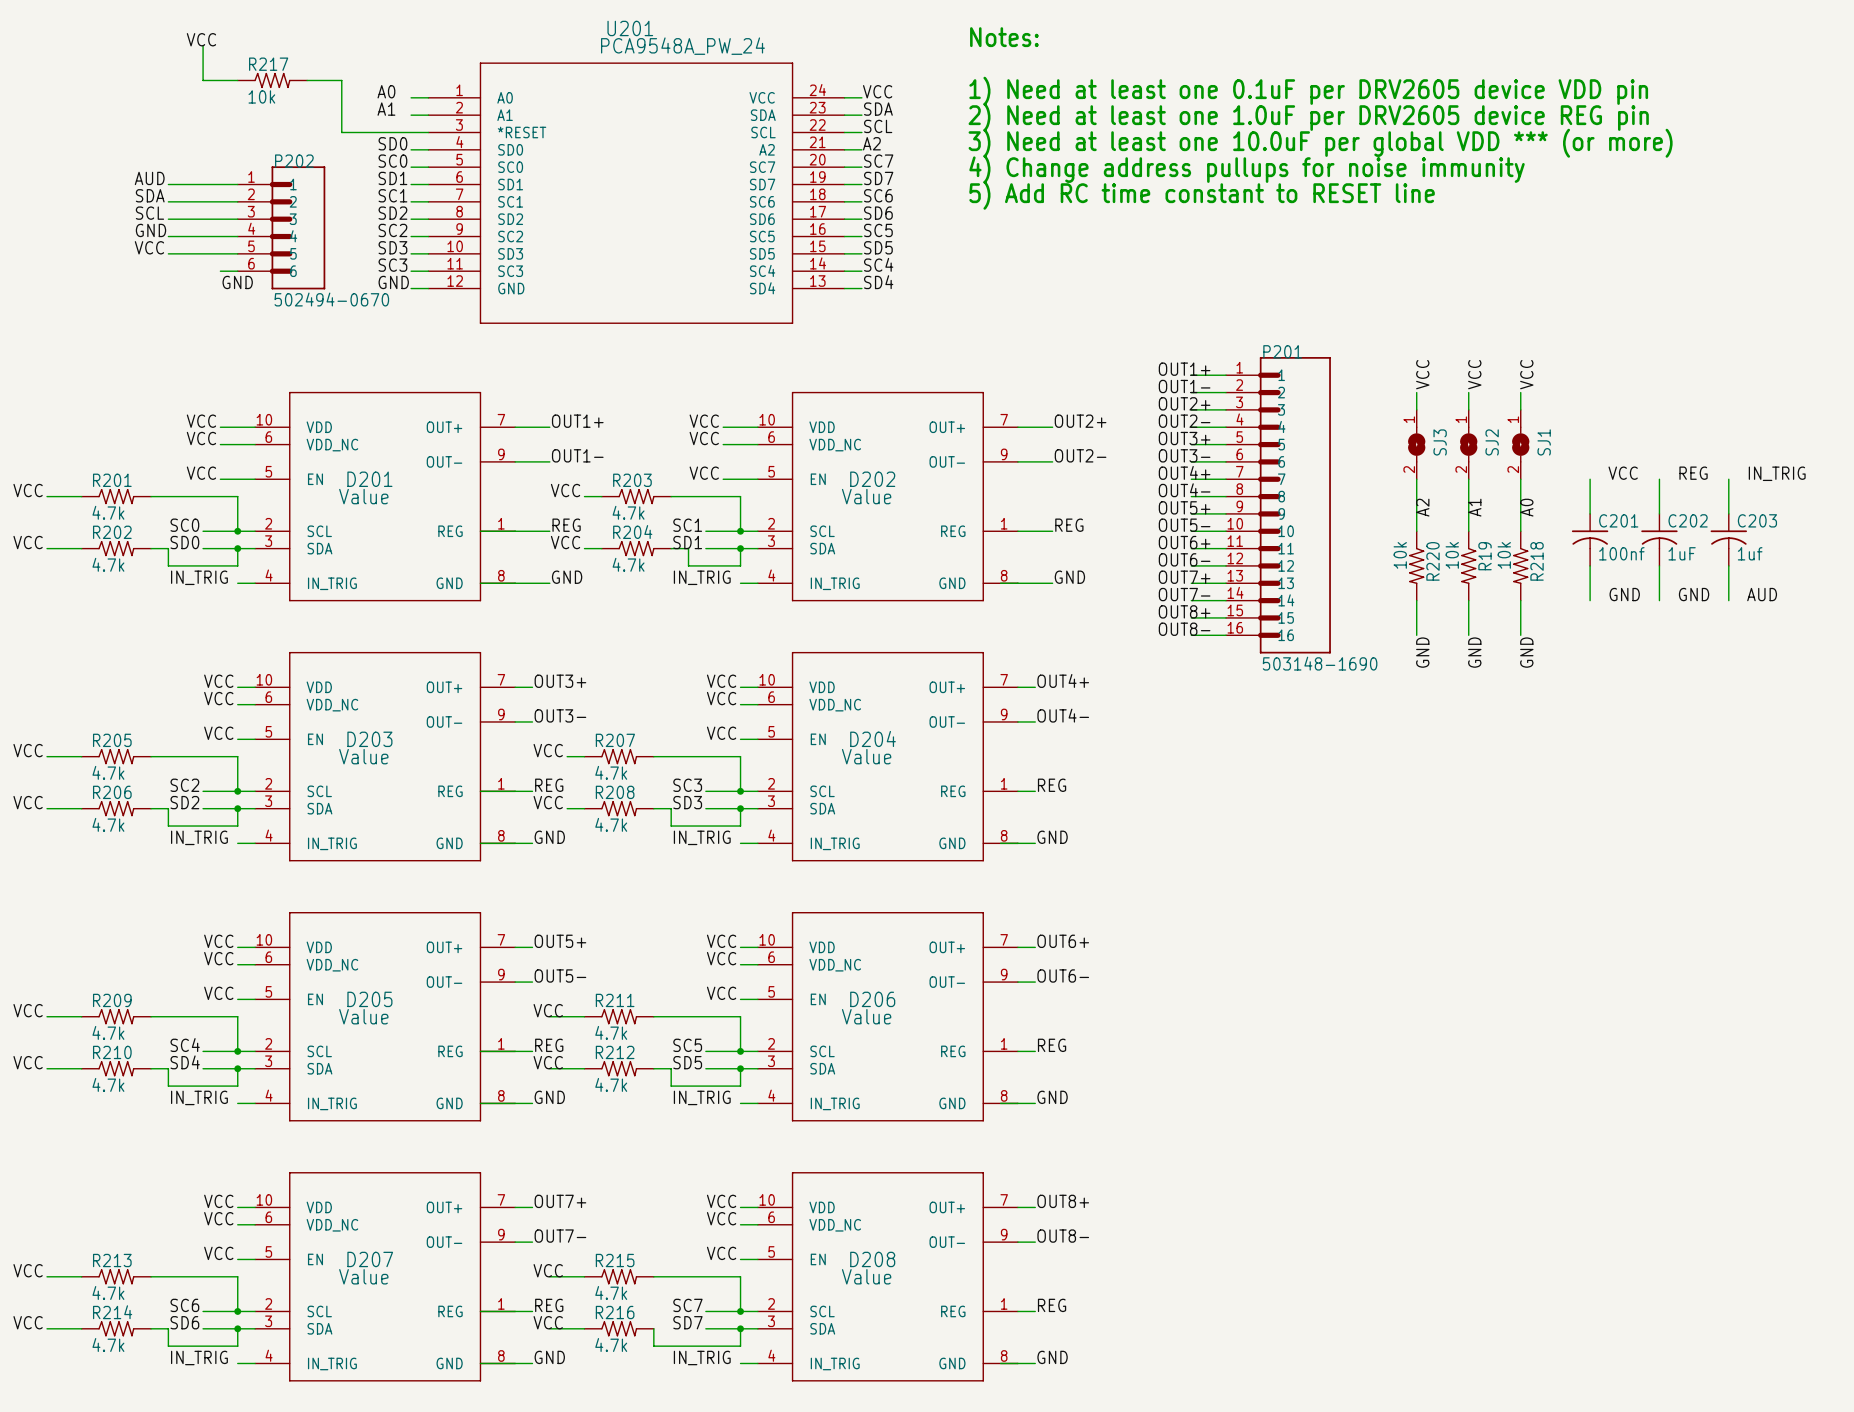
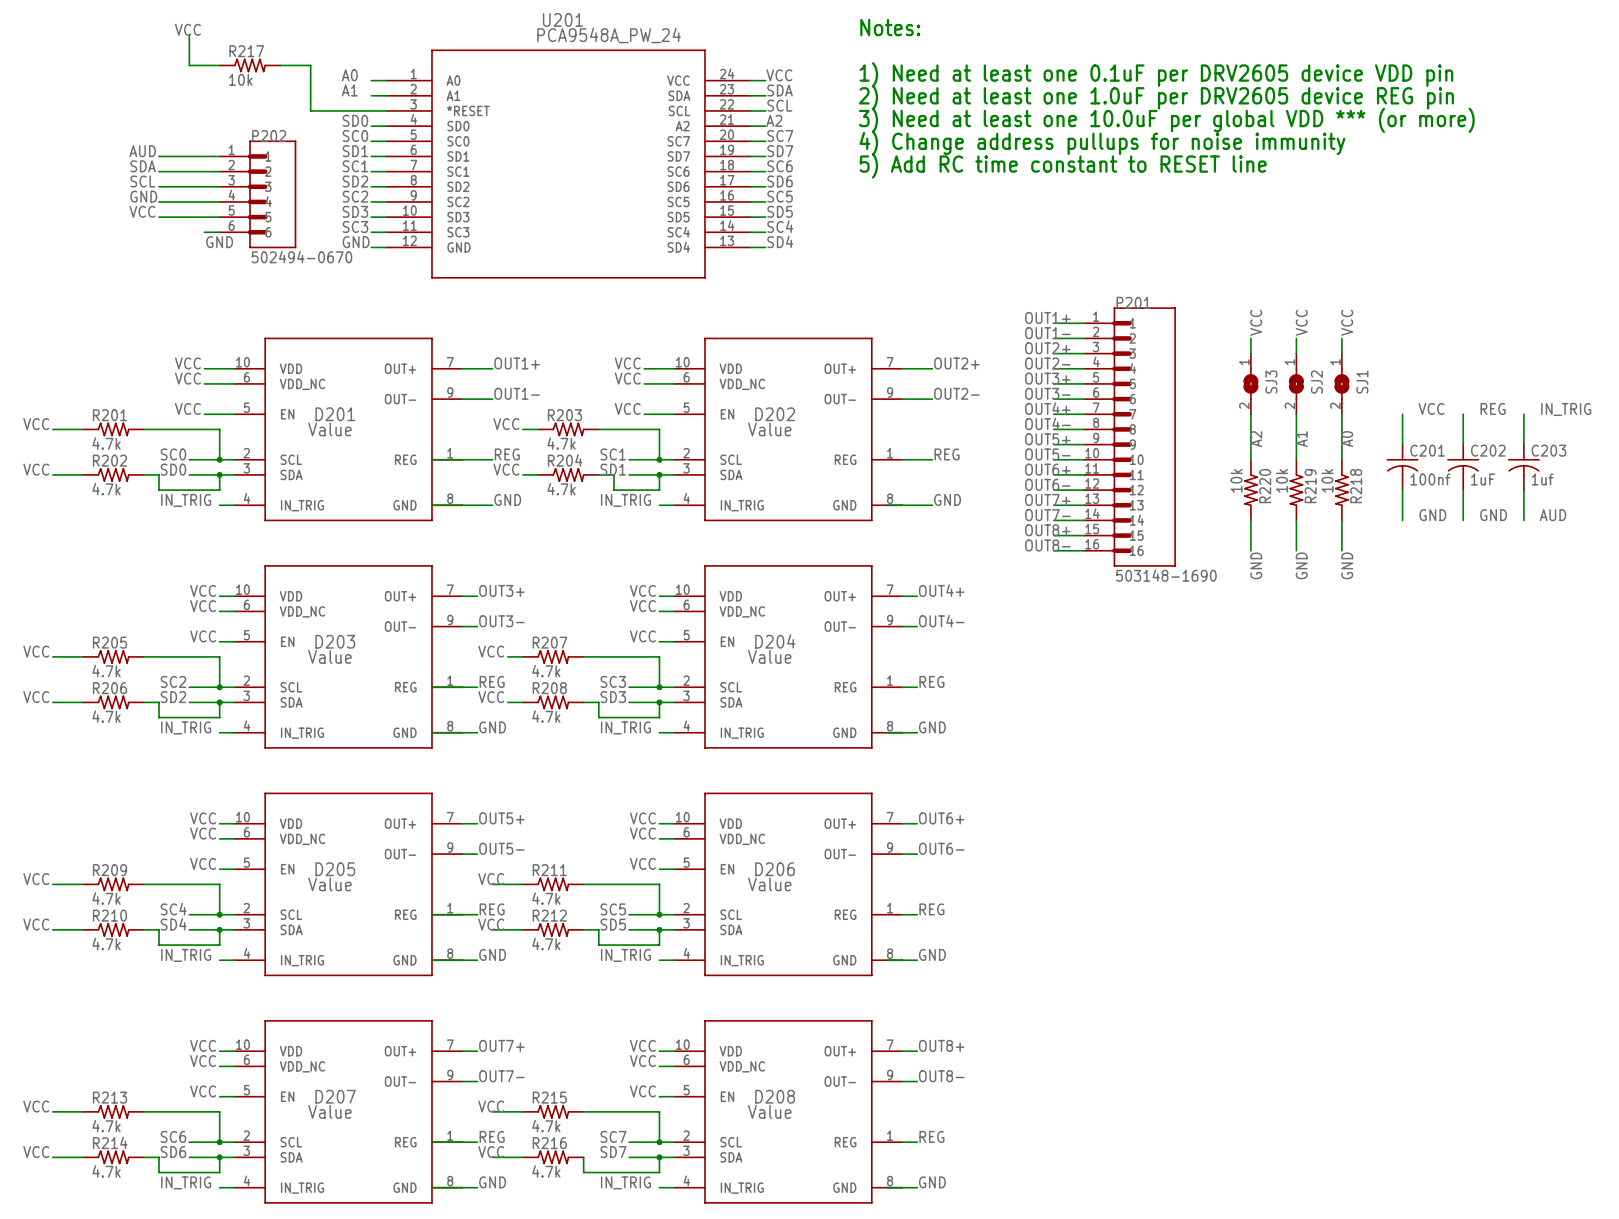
R19 name: R19 (1485, 556) -> R219 (1310, 486)

